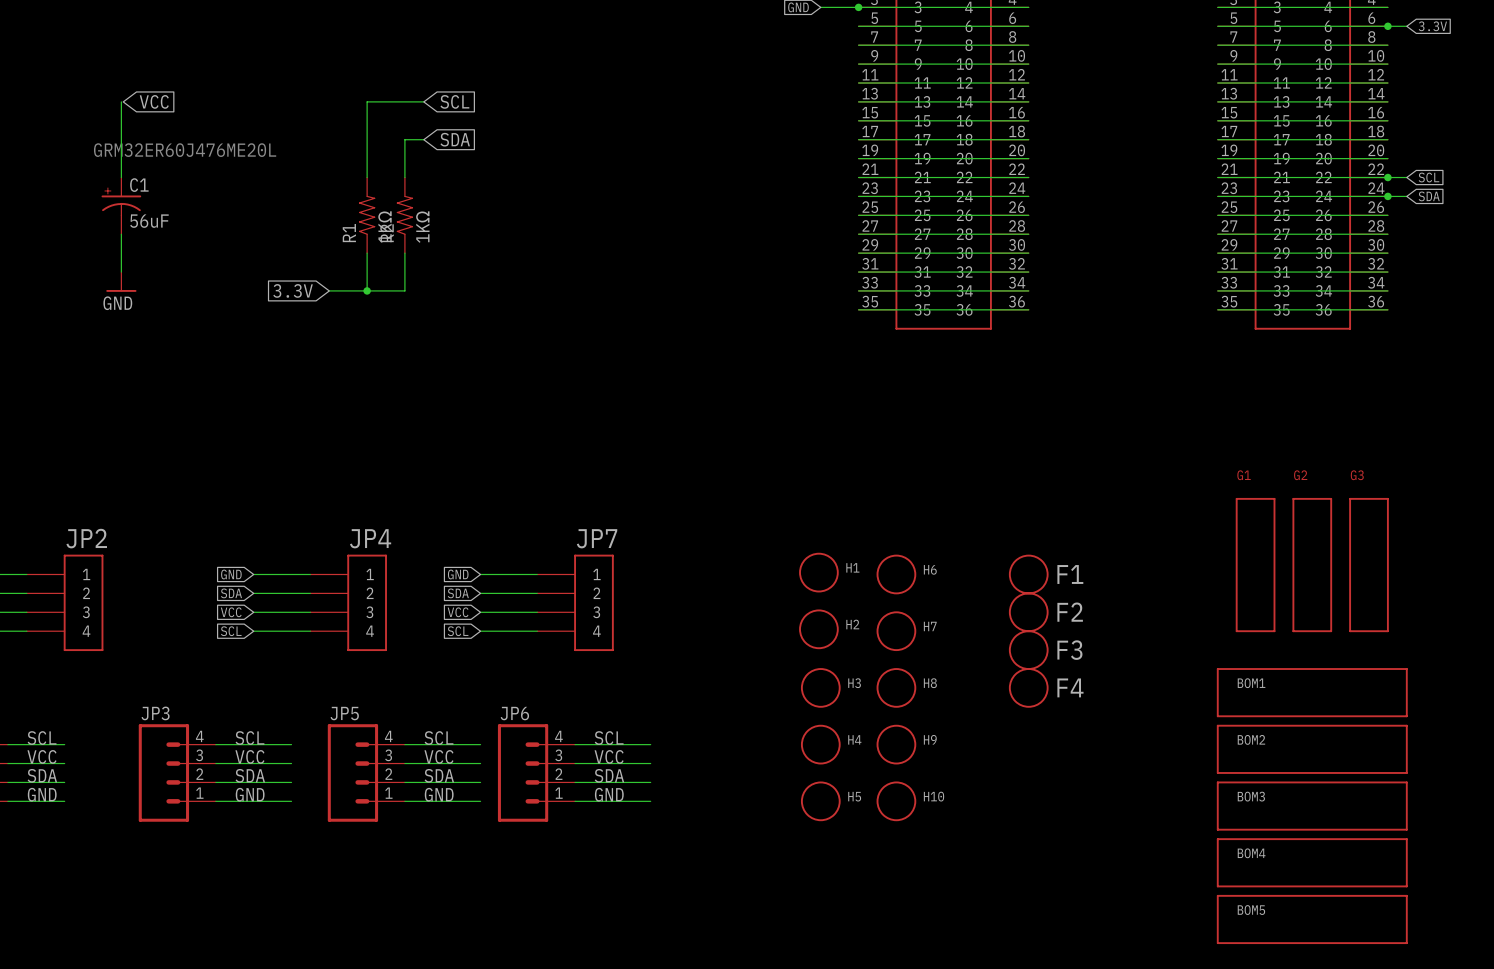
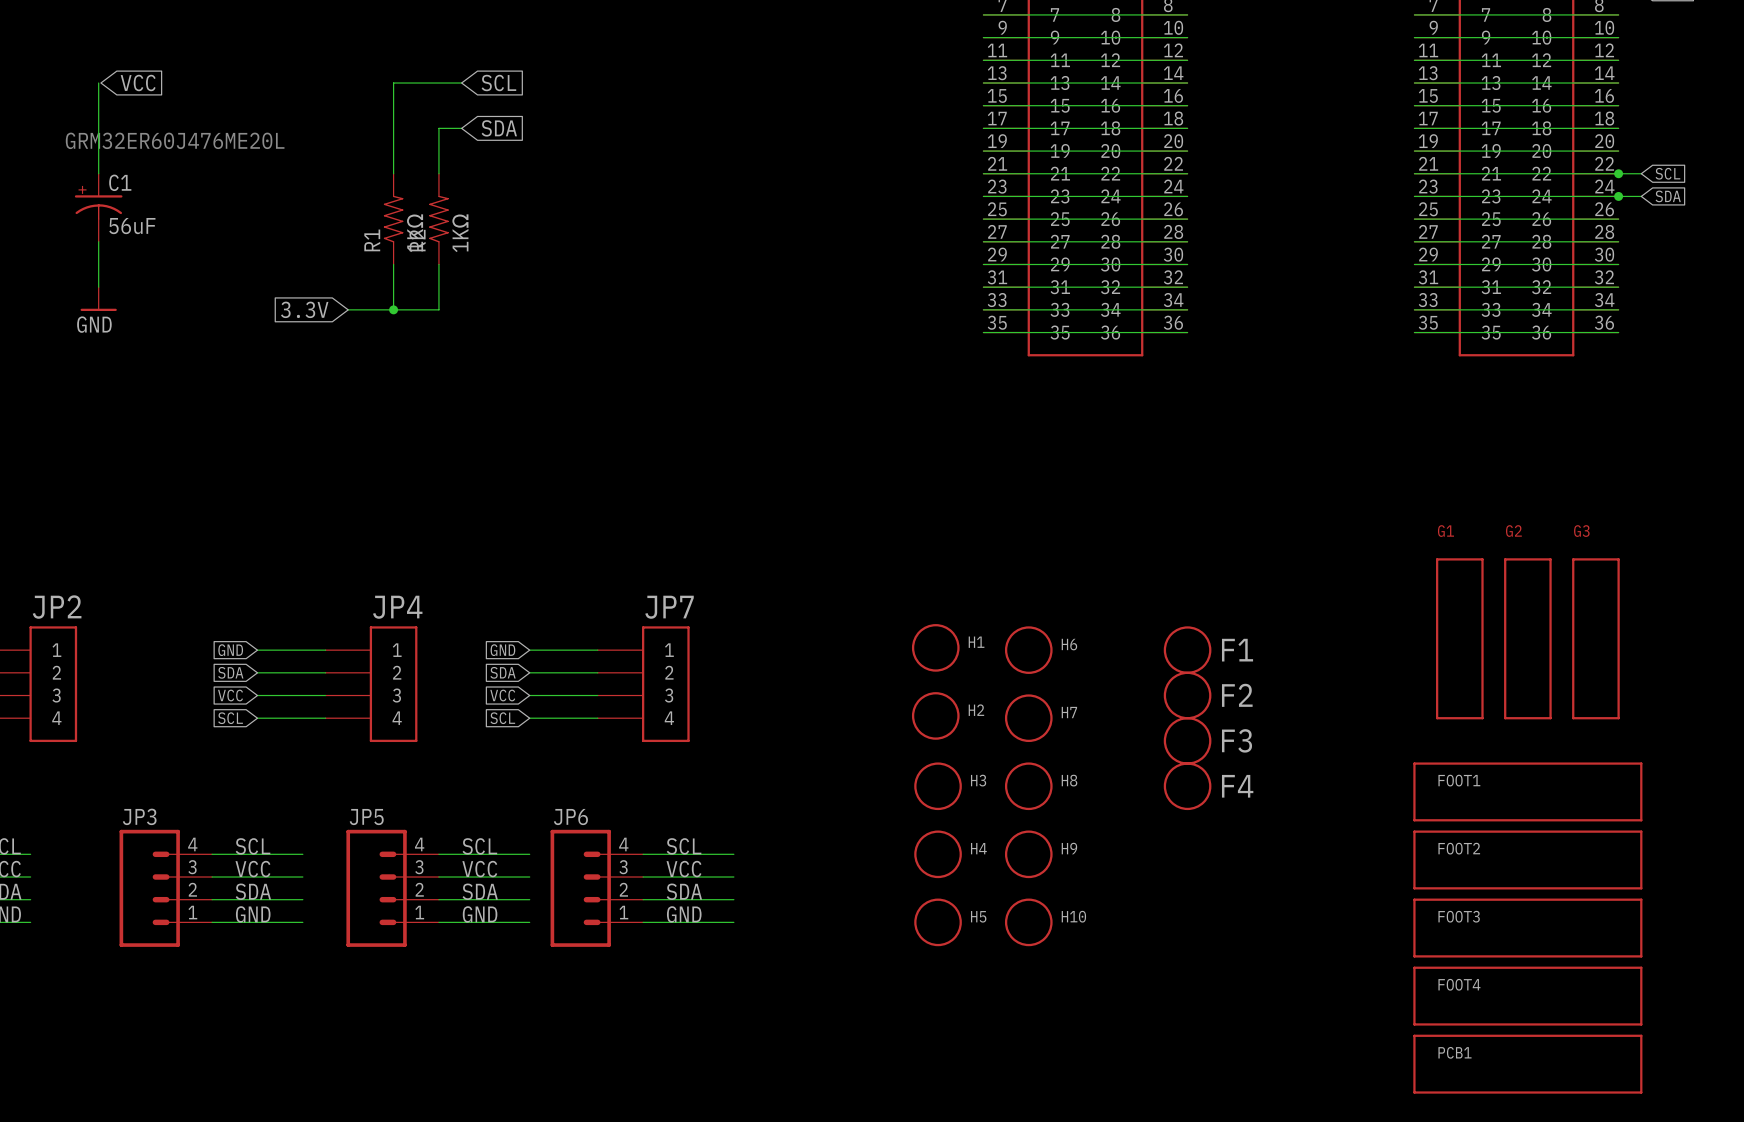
BOM1 name: BOM1 (1251, 683) -> FOOT1 (1459, 780)
BOM2 name: BOM2 (1251, 739) -> FOOT2 (1459, 848)
BOM3 name: BOM3 (1251, 796) -> FOOT3 (1459, 916)
BOM4 name: BOM4 (1251, 853) -> FOOT4 (1459, 984)
BOM5 name: BOM5 (1251, 910) -> PCB1 (1454, 1052)

